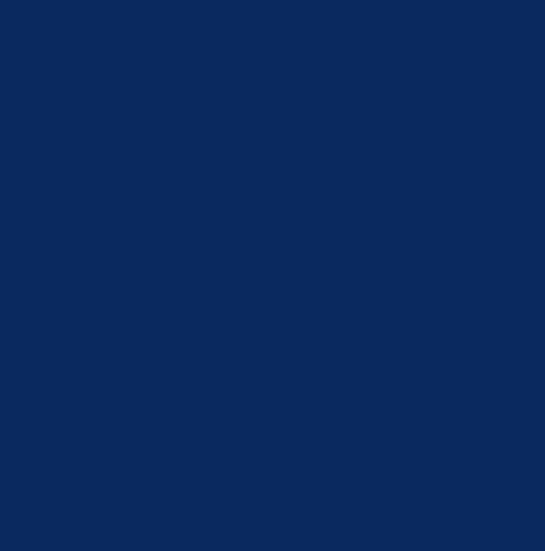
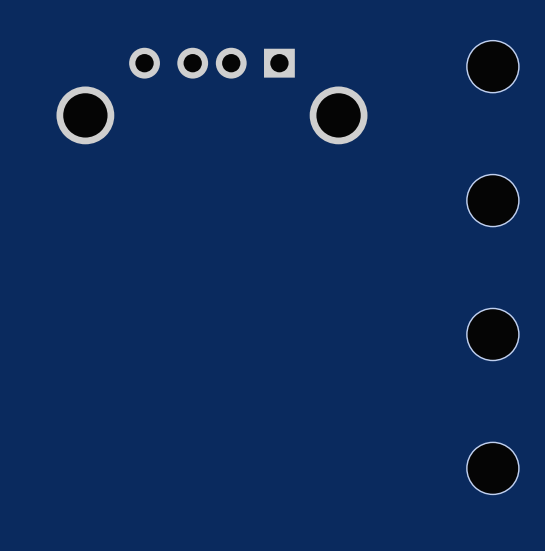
part: none -> (492, 66)
part: none -> (211, 96)
part: none -> (492, 200)
part: none -> (492, 334)
part: none -> (492, 468)

